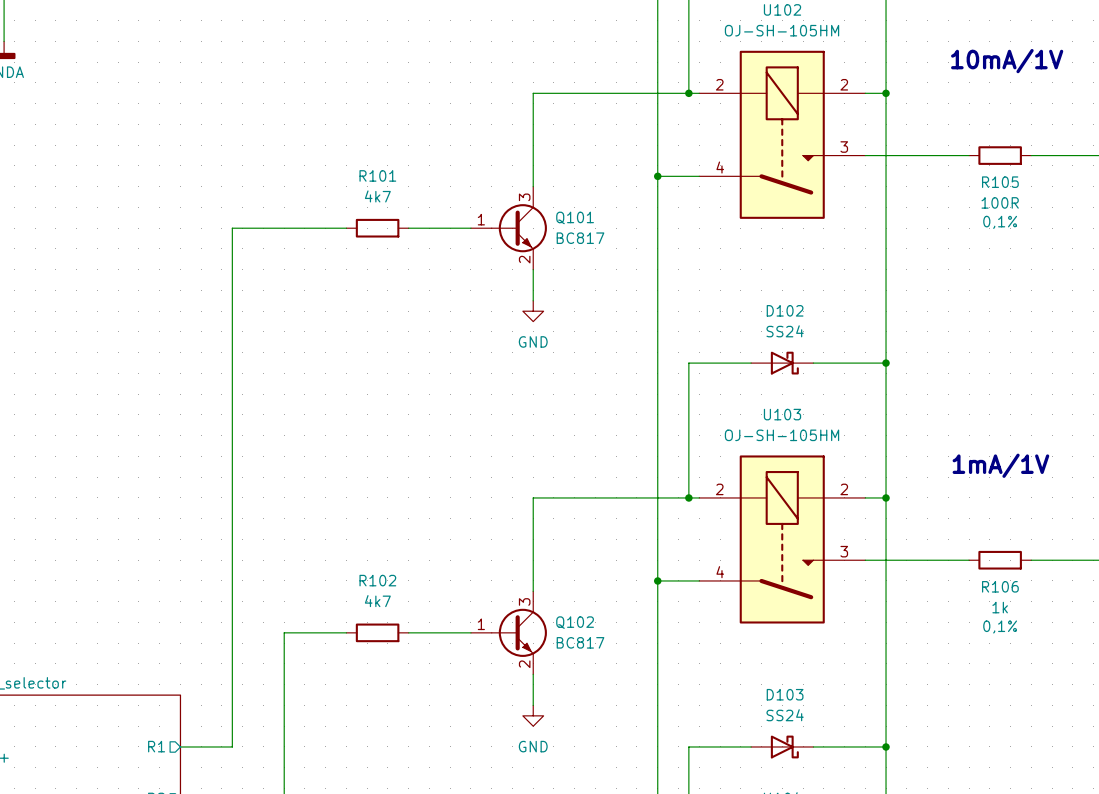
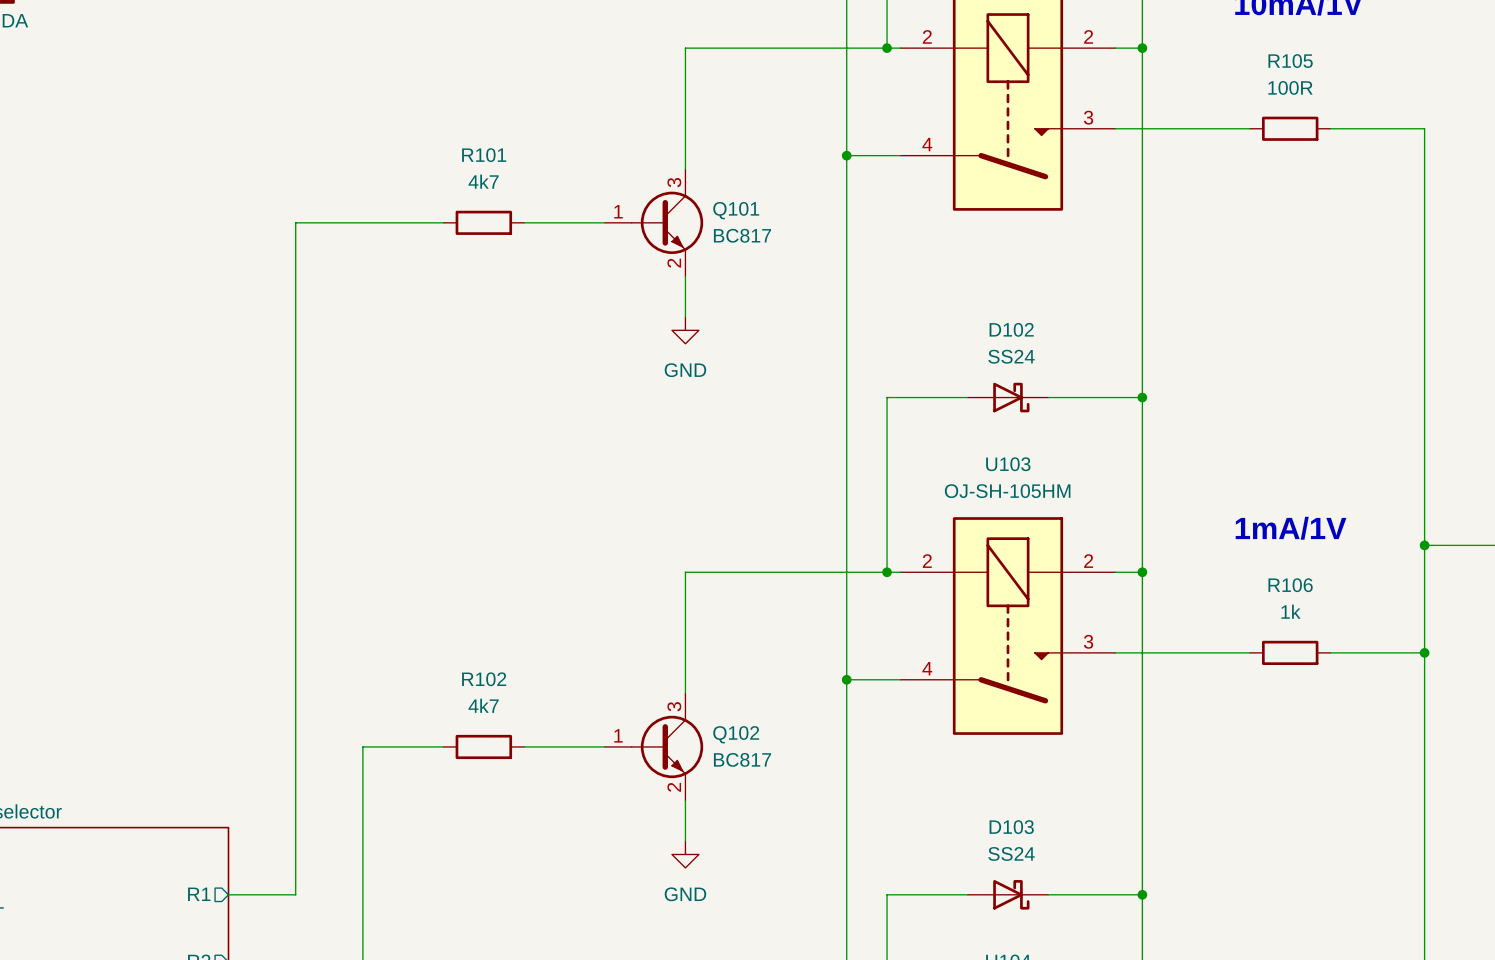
R105 name position: R105 (1000, 182) -> R105 (1290, 61)
R105 value position: 100R (1000, 202) -> 100R (1290, 87)
R105 text: 0,1% (1000, 222) -> none
R106 name position: R106 (1000, 586) -> R106 (1290, 585)
R106 value position: 1k (1000, 607) -> 1k (1290, 611)
R106 text: 0,1% (1000, 626) -> none

